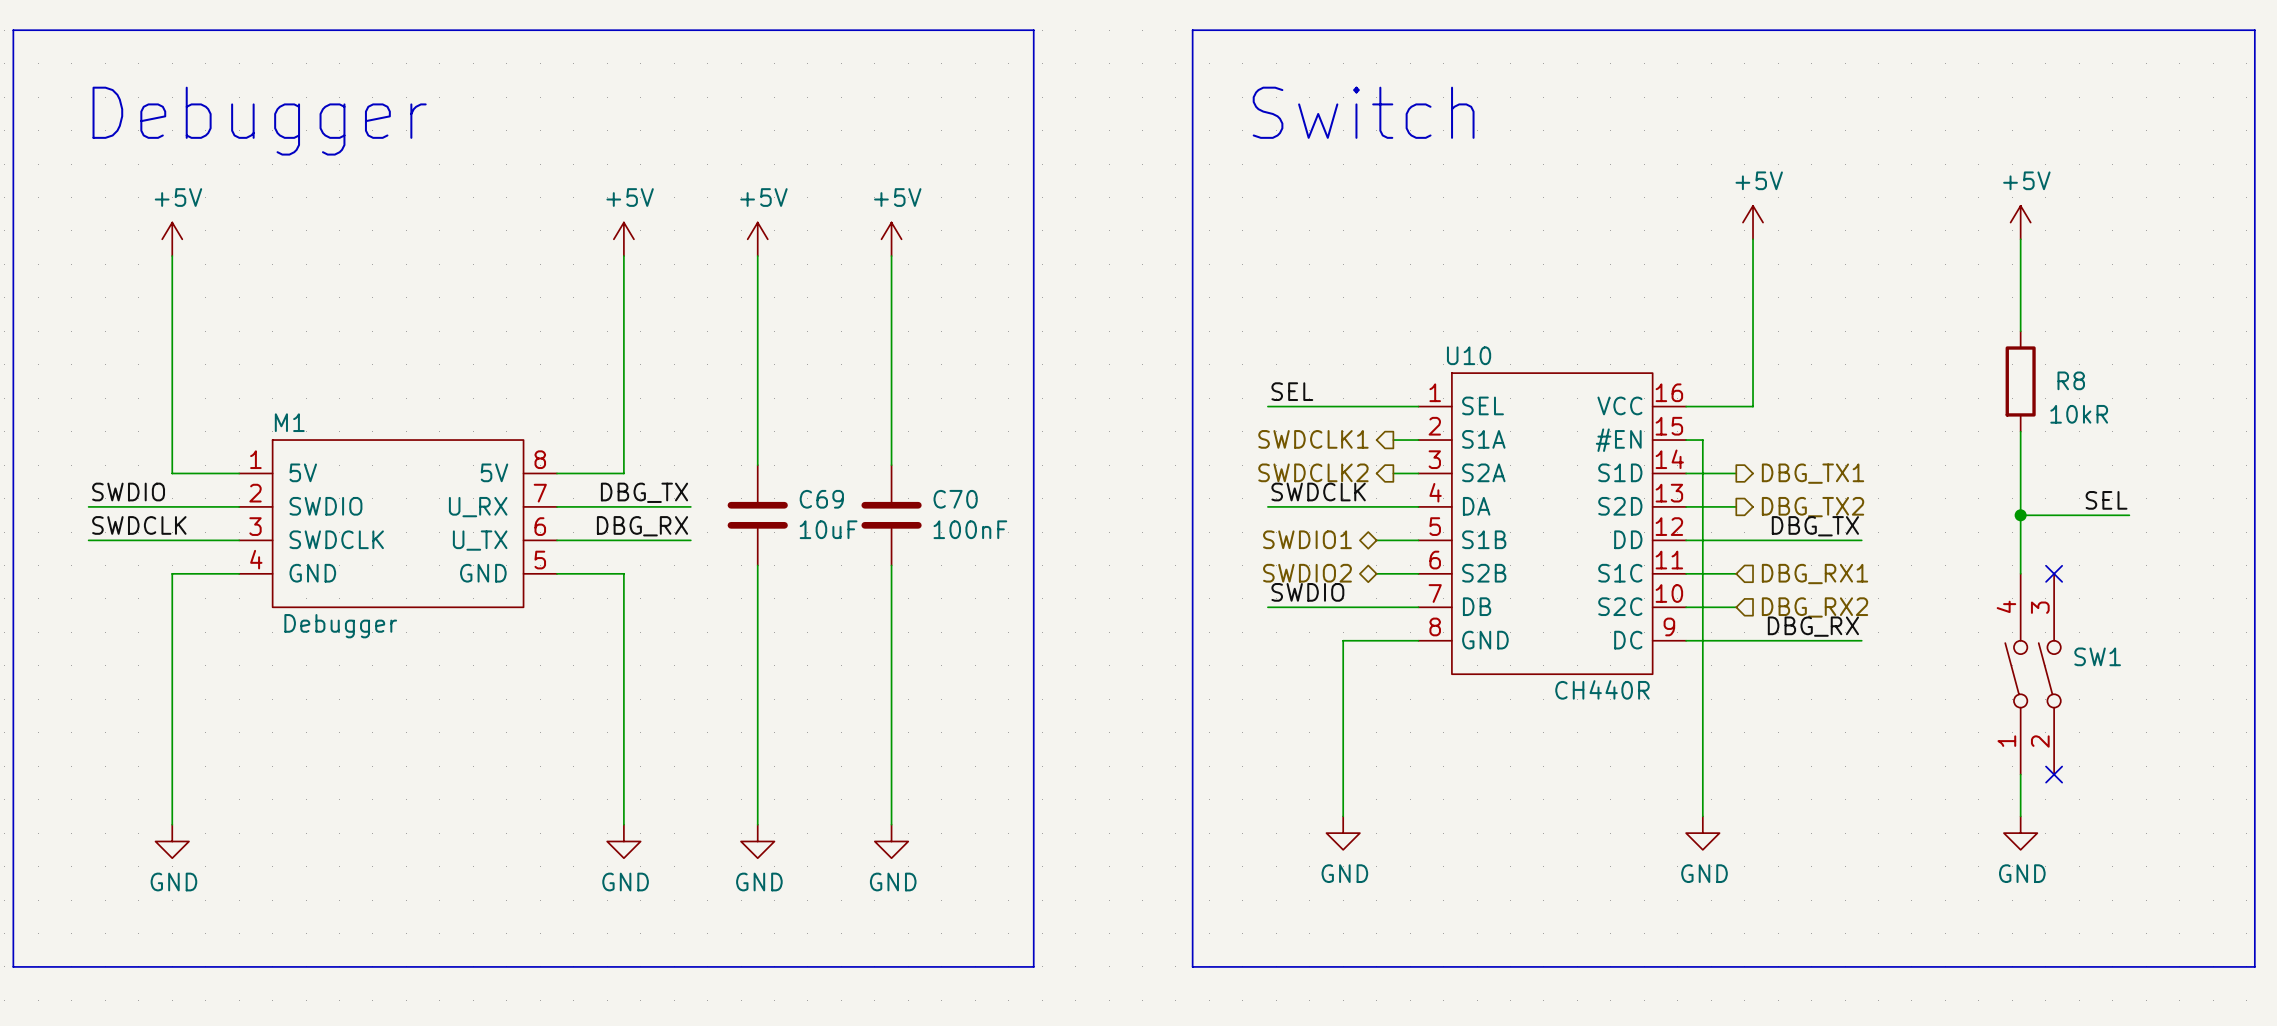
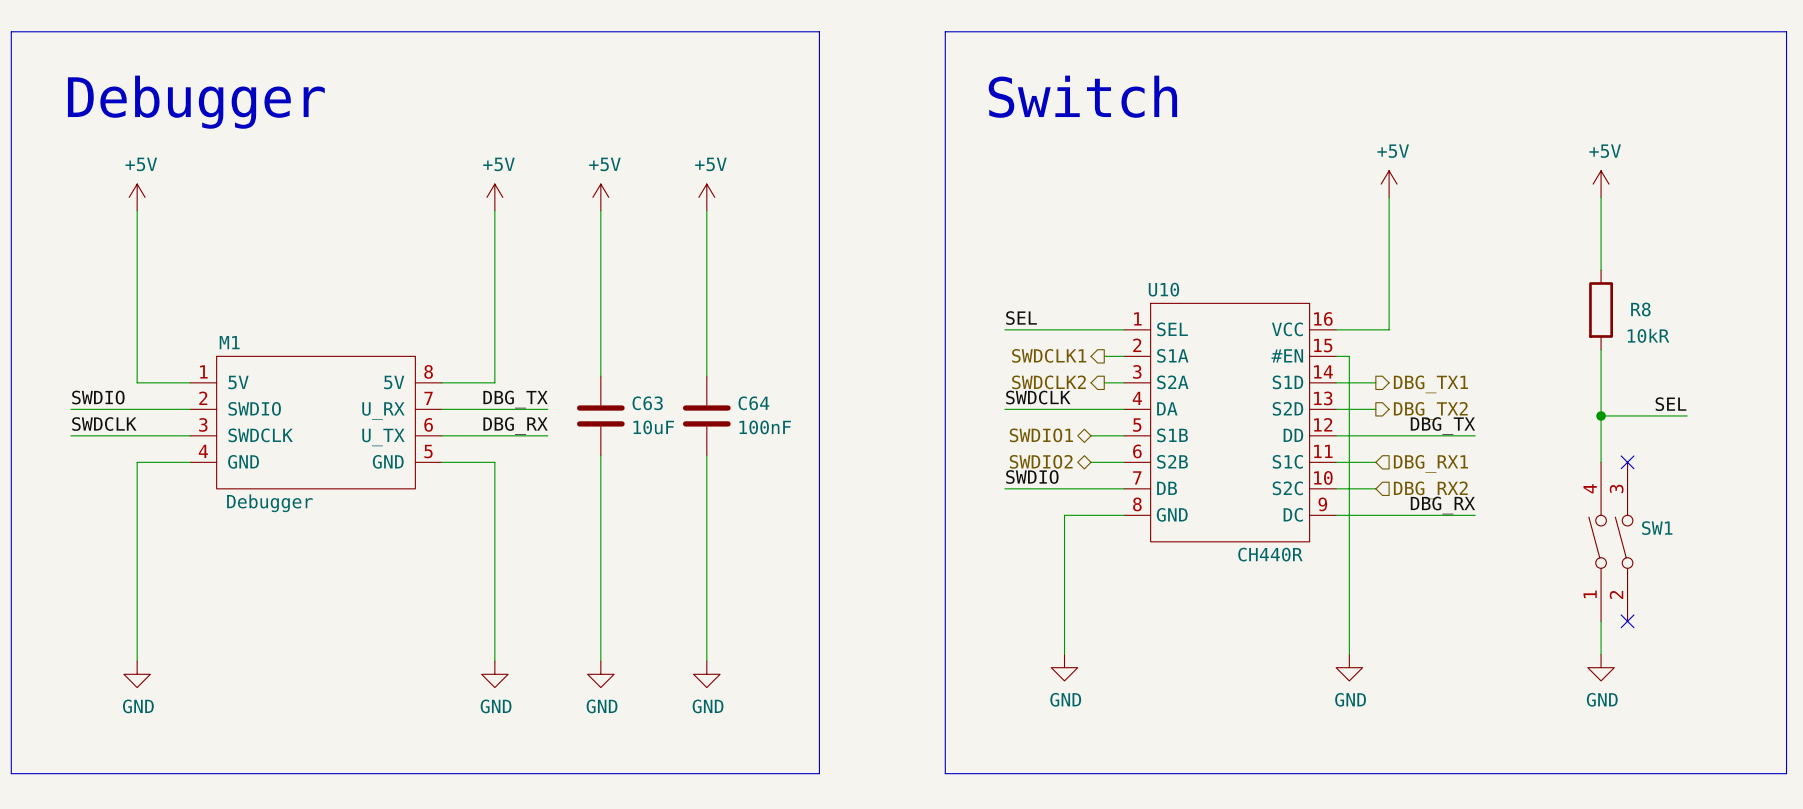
C69 name: C69 (821, 499) -> C63 (647, 403)
C70 name: C70 (955, 499) -> C64 (753, 403)

